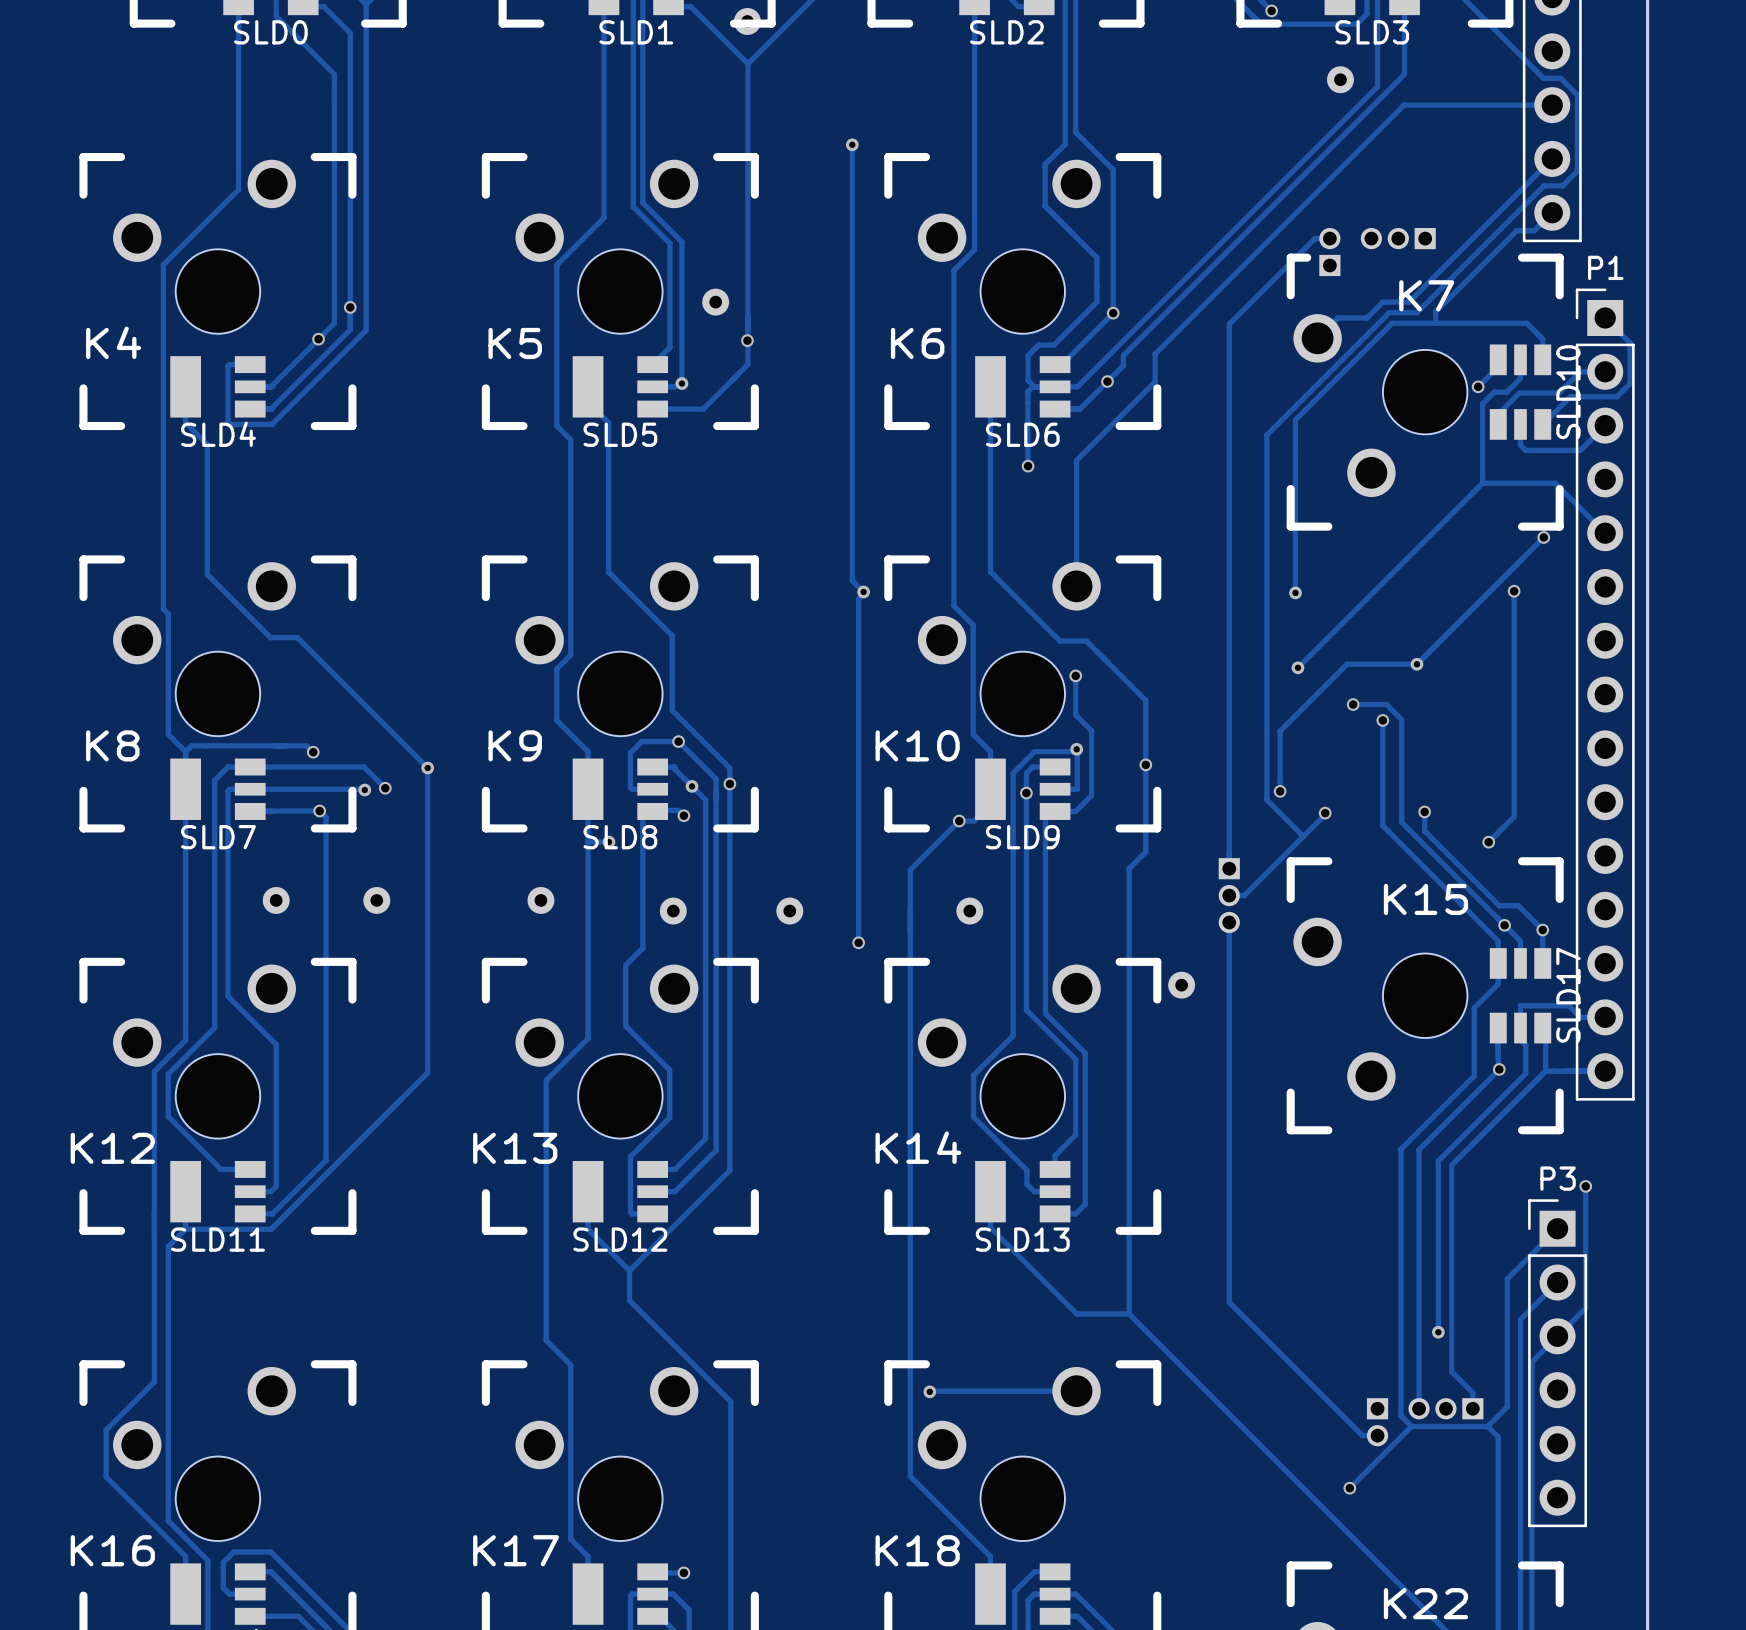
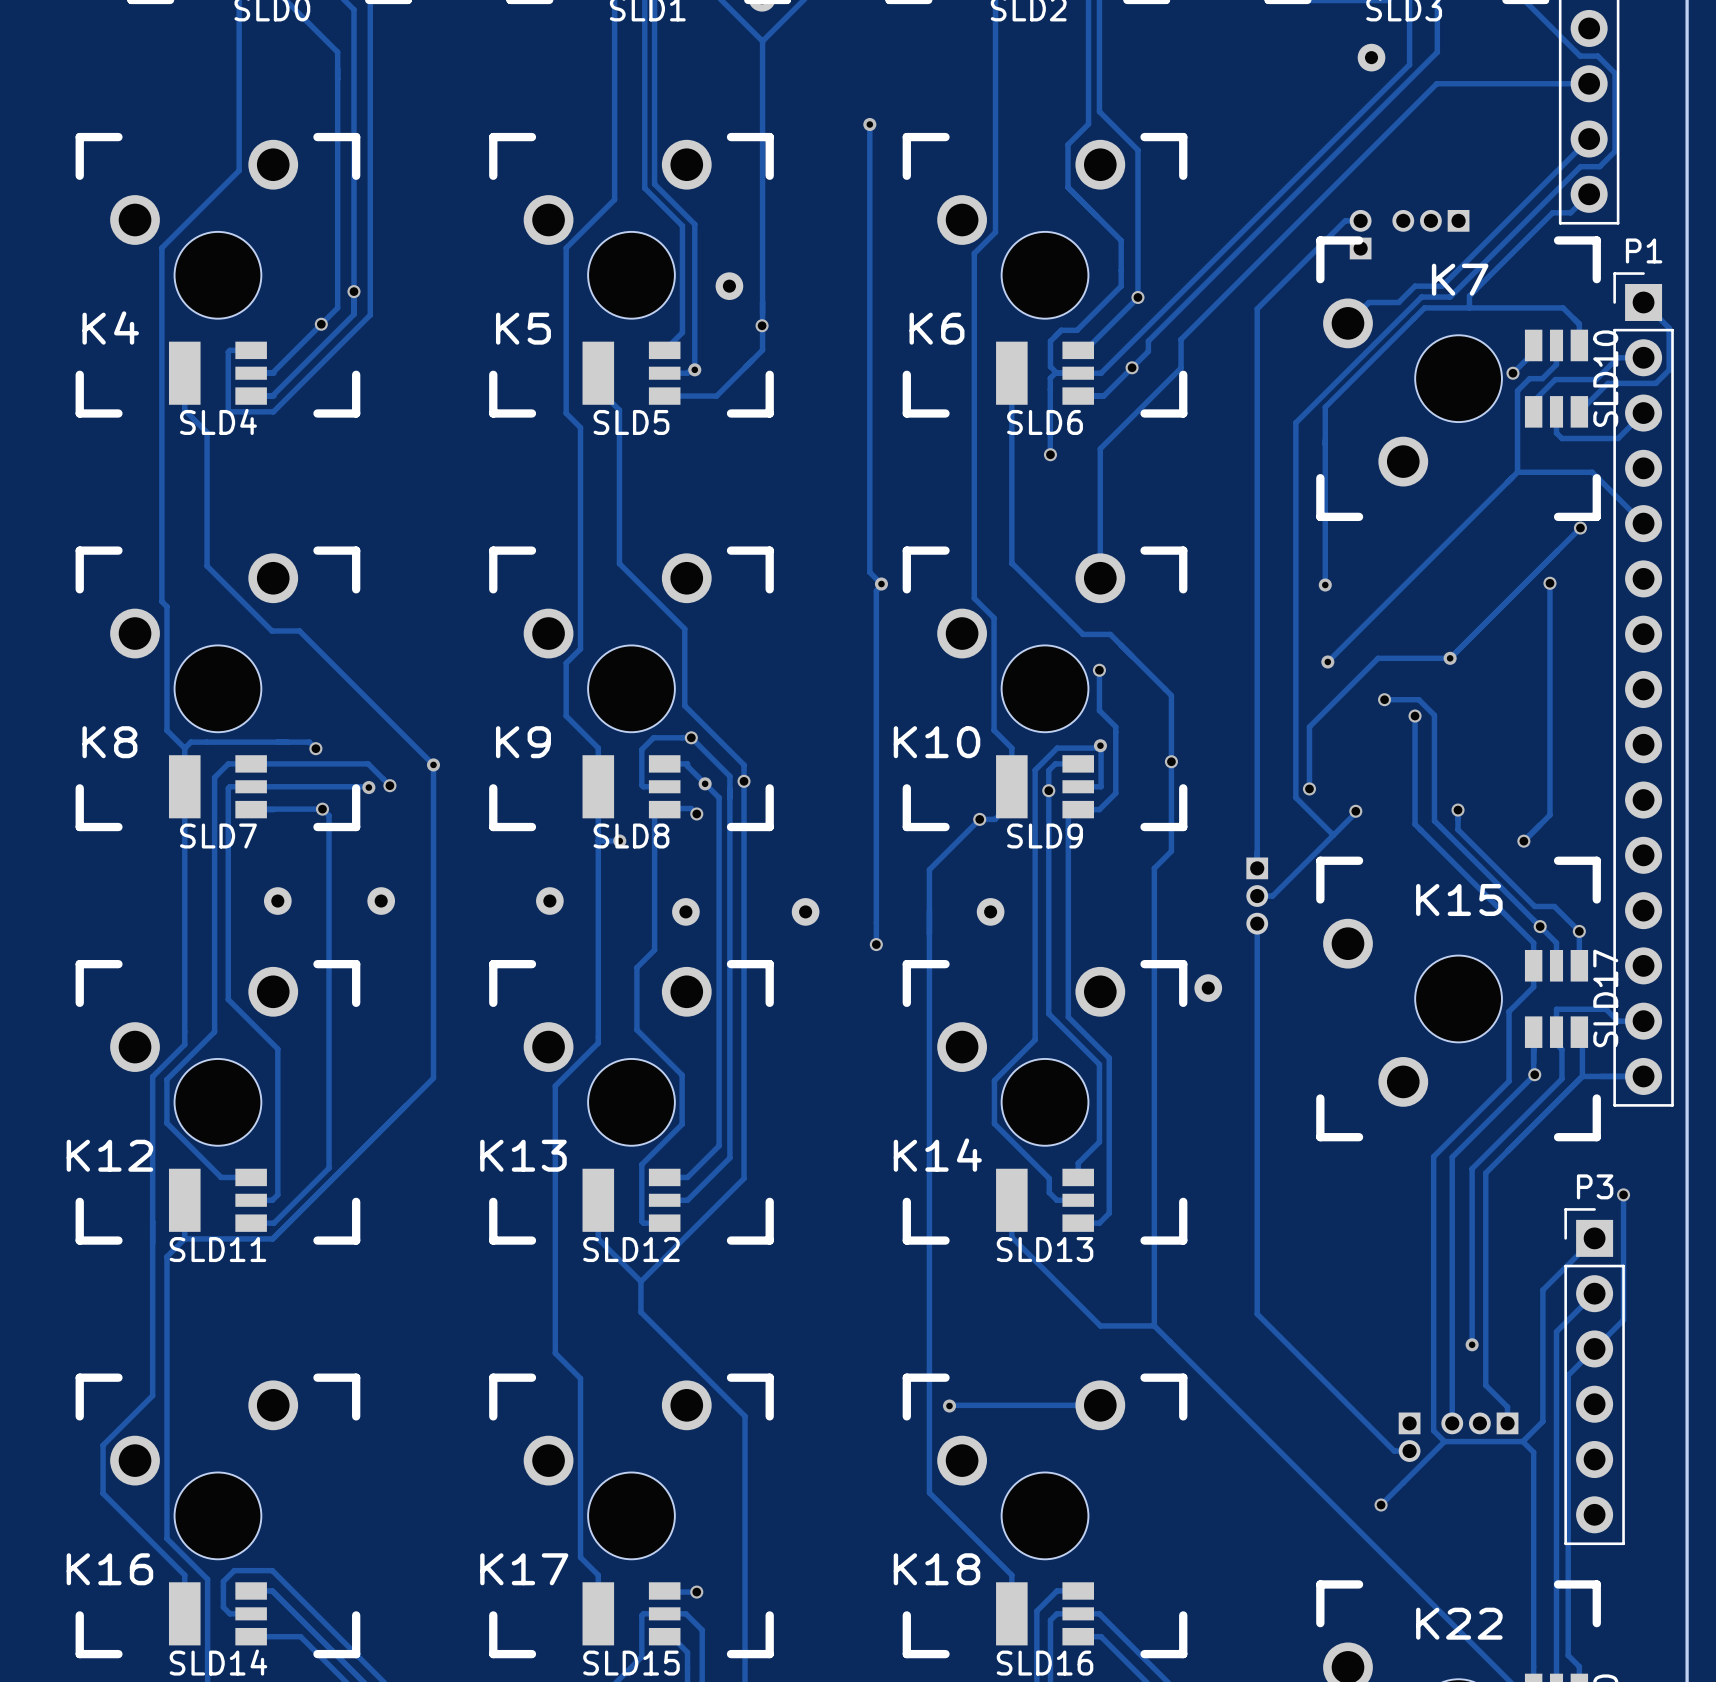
K7 footprint: [1286, 253, 1564, 531] -> [1316, 236, 1601, 522]

